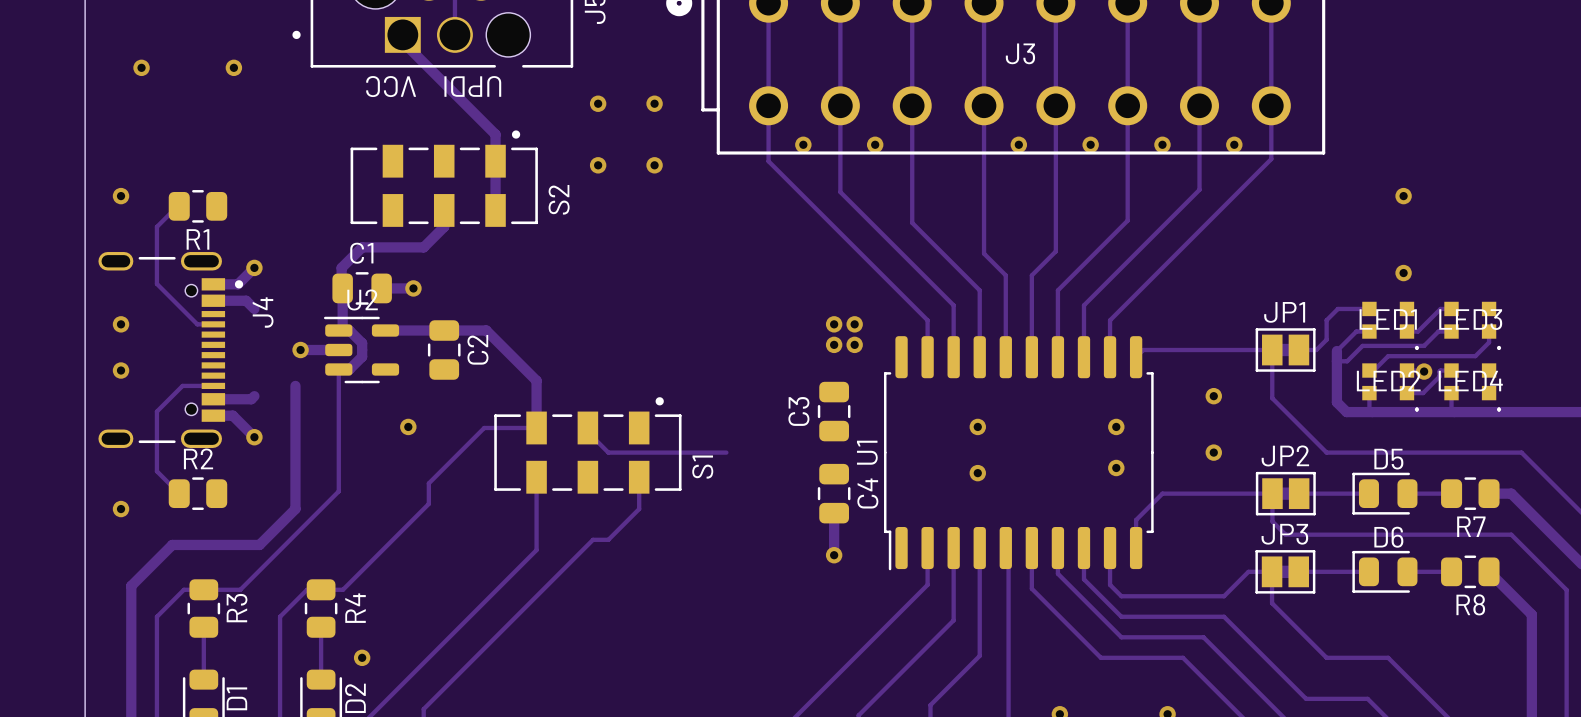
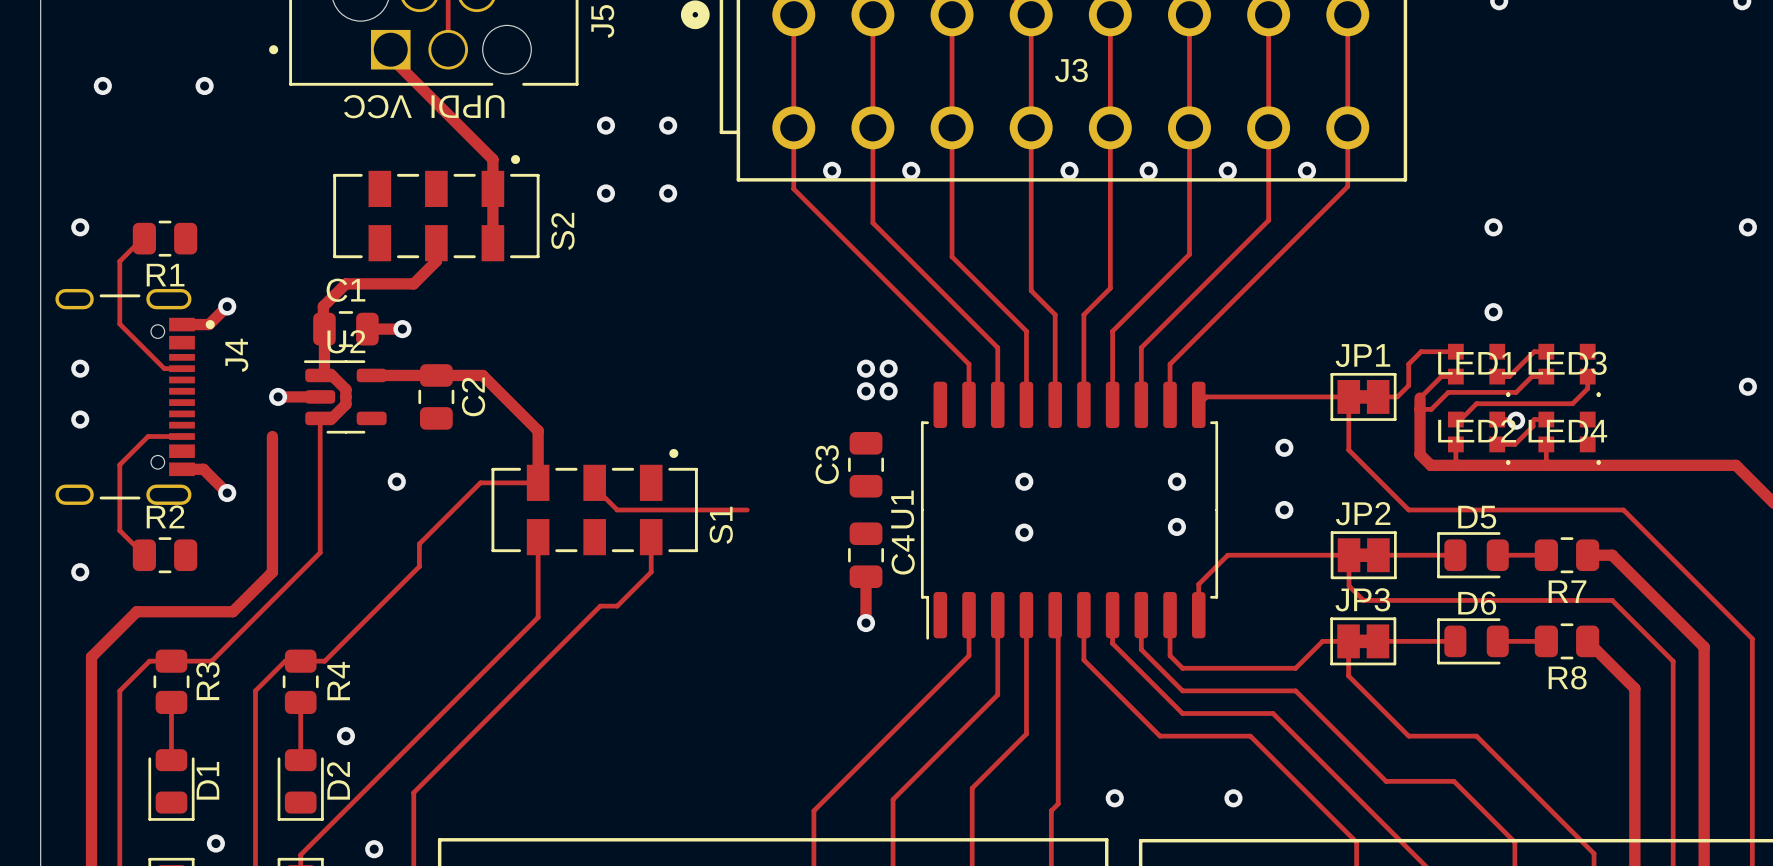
track: (213, 300) (246, 300) (254, 308) -> none
track: (254, 396) (251, 399) (213, 399) -> none

